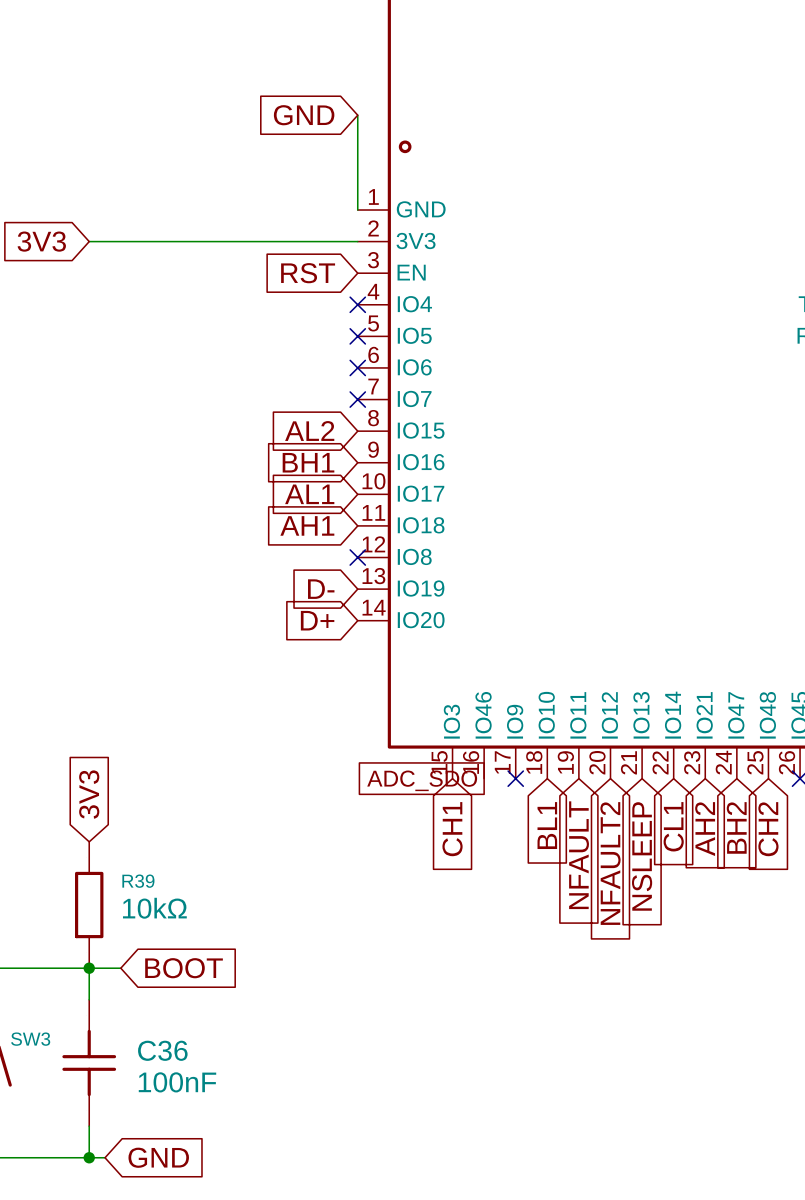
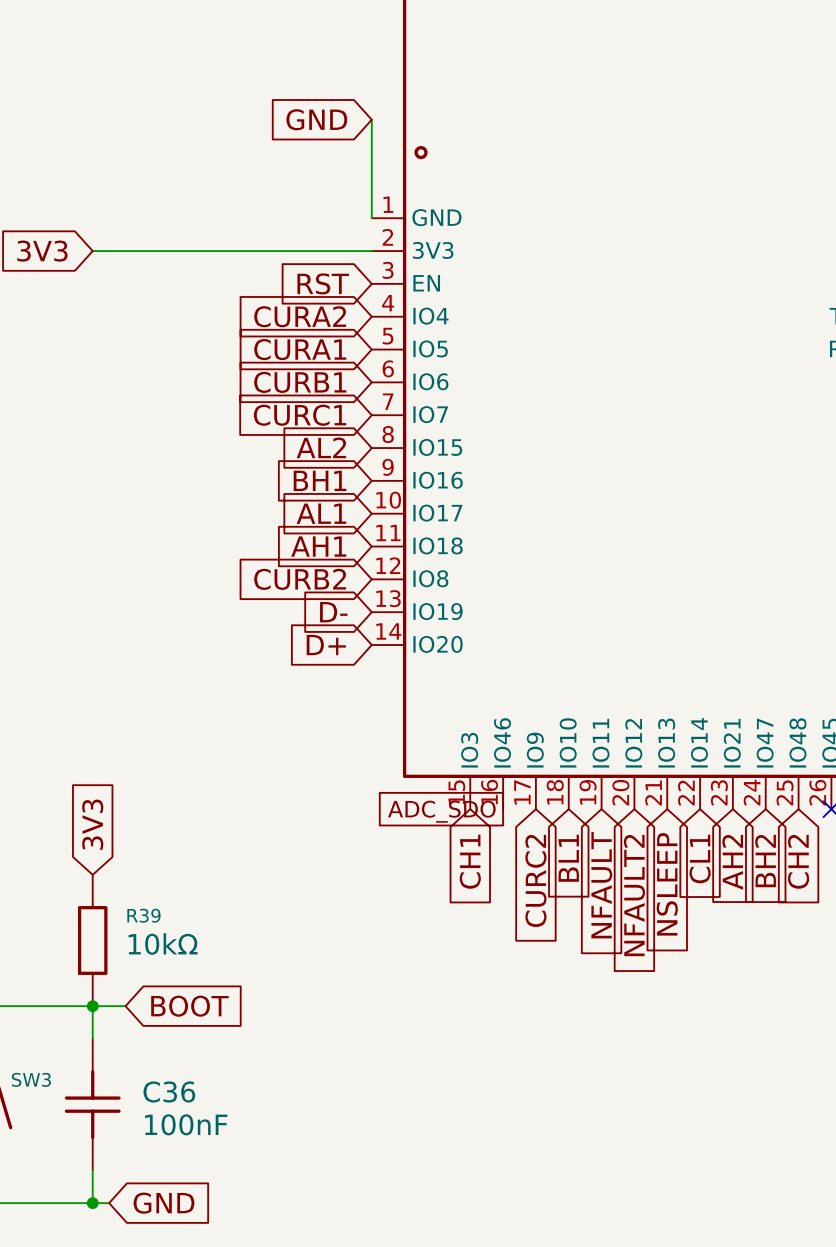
global label: none -> CURA2 (300, 316)
no-connect mark: (357, 304) -> none
global label: none -> CURA1 (300, 349)
no-connect mark: (357, 336) -> none
global label: none -> CURB1 (300, 382)
no-connect mark: (357, 367) -> none
global label: none -> CURC1 (300, 415)
no-connect mark: (357, 399) -> none
global label: none -> CURB2 (300, 579)
no-connect mark: (357, 557) -> none
no-connect mark: (515, 778) -> none
global label: none -> CURC2 (535, 880)

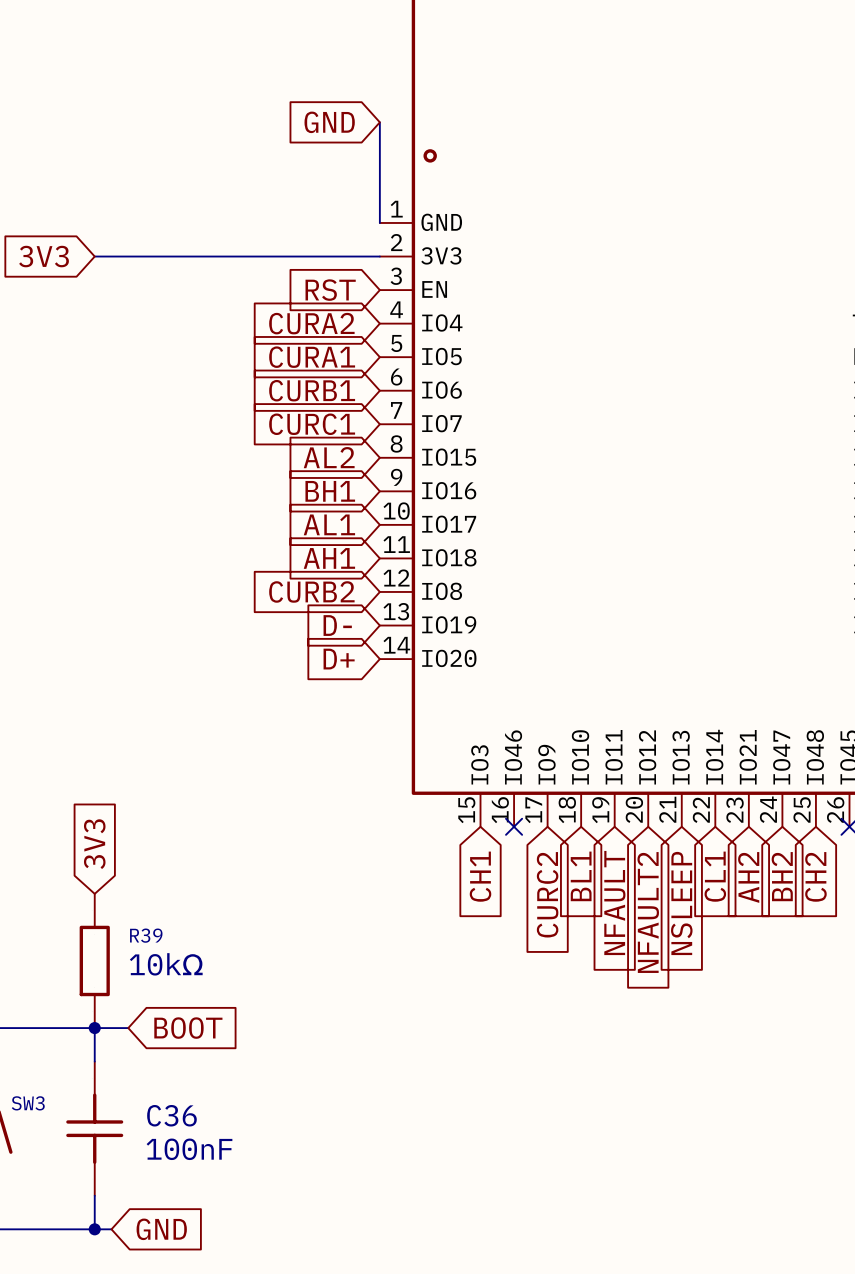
no-connect mark: none -> (514, 826)
global label: ADC_SDO (441, 811) -> none

